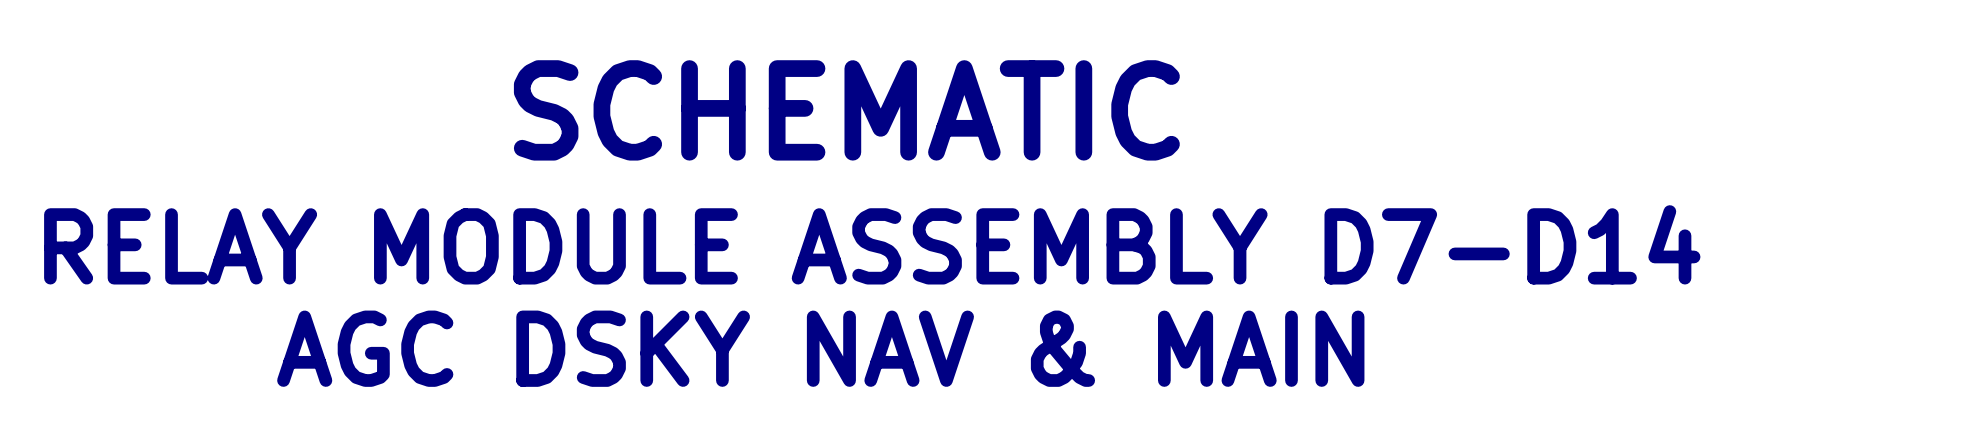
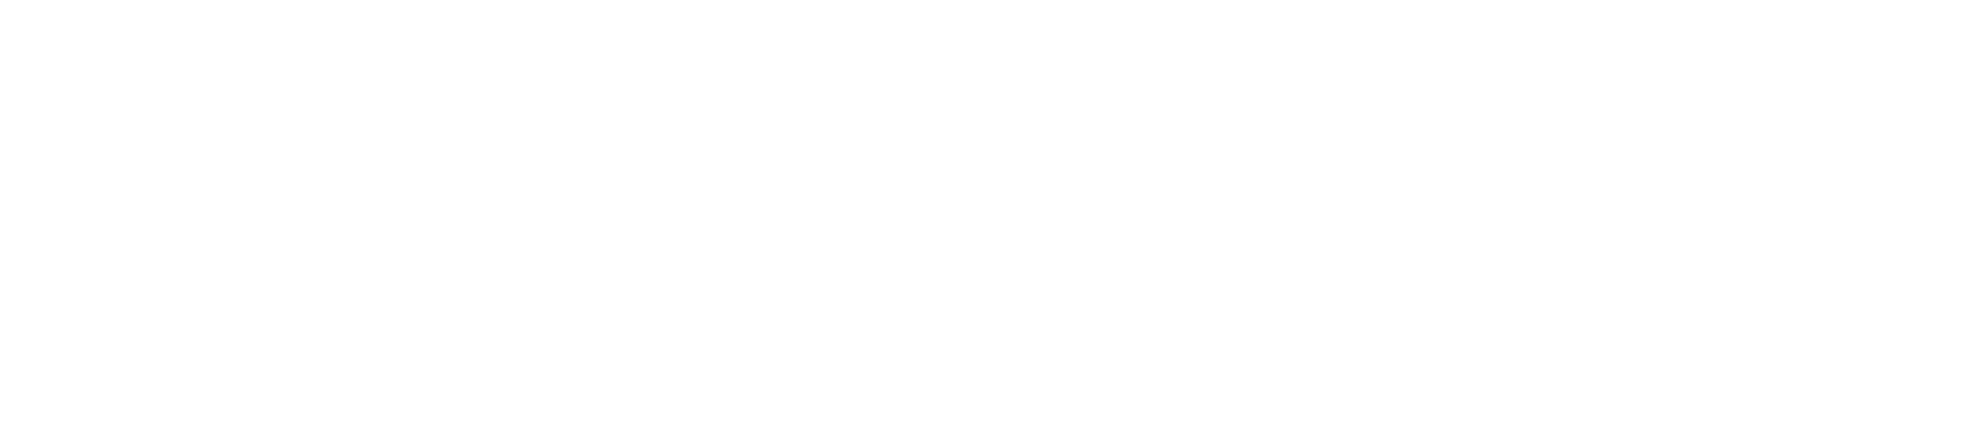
text: SCHEMATIC (846, 110) -> none
text: RELAY MODULE ASSEMBLY D7-D14 (872, 244) -> none
text: AGC DSKY NAV & MAIN (820, 348) -> none

